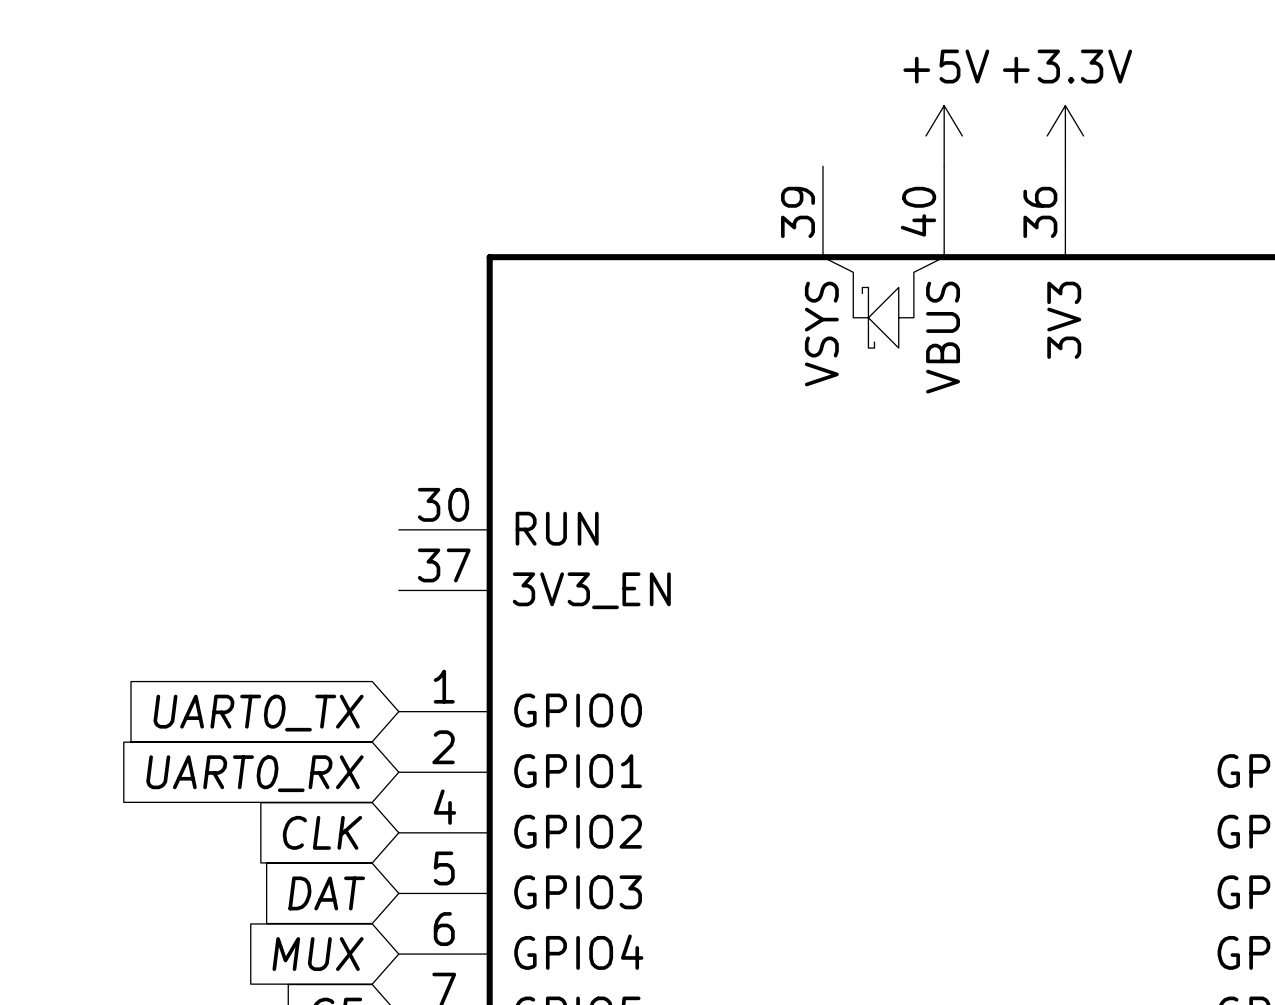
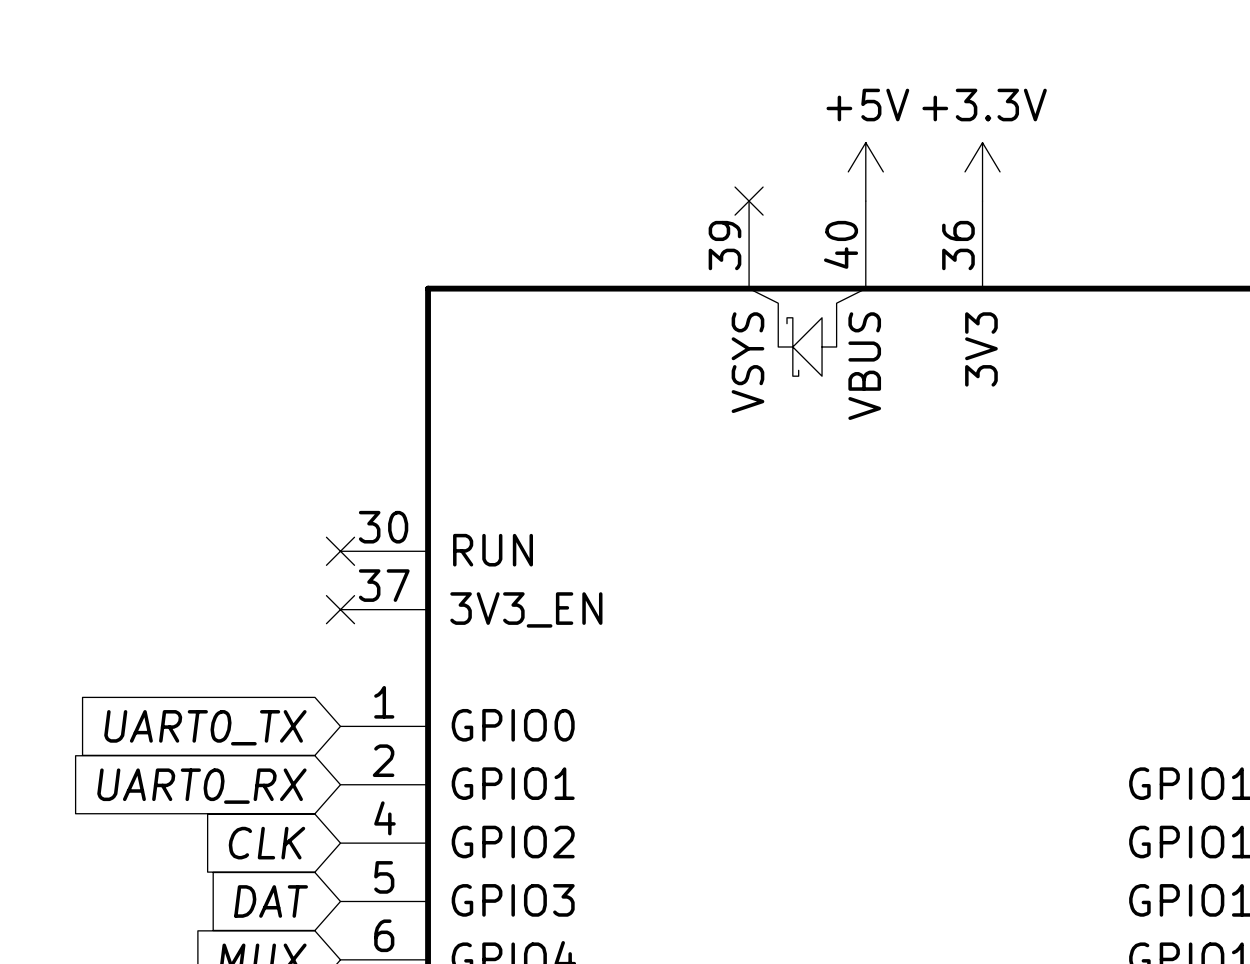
no-connect mark: none -> (749, 201)
no-connect mark: none -> (340, 551)
no-connect mark: none -> (340, 609)

